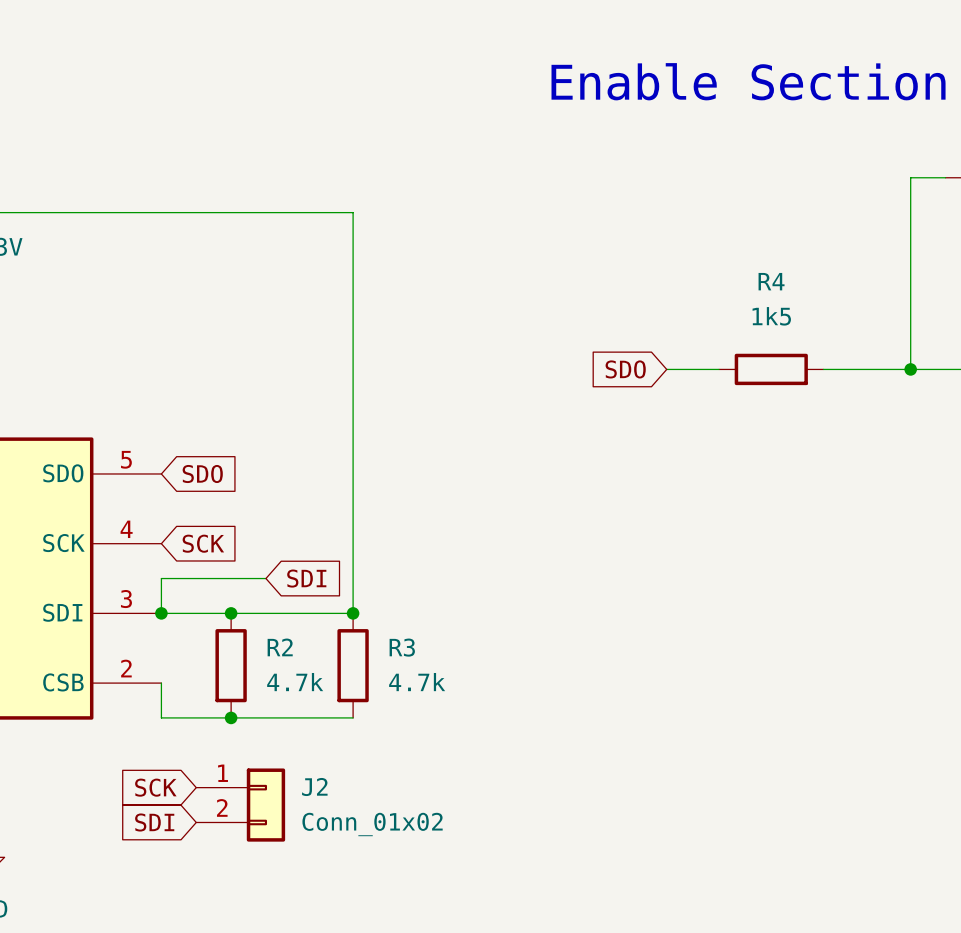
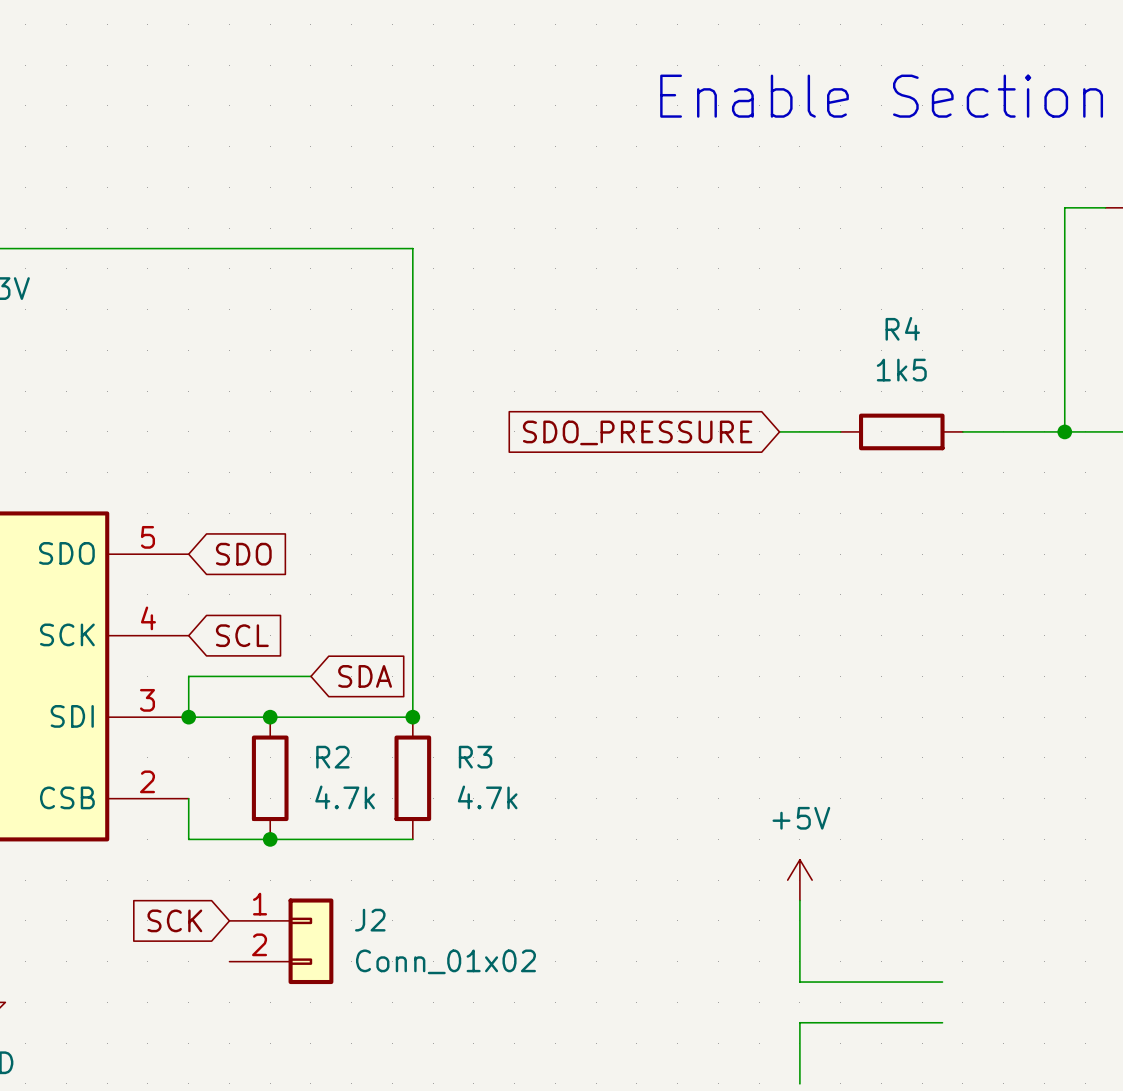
global label: SDO (625, 369) -> SDO_PRESSURE (637, 432)
global label: SCK (203, 543) -> SCL (242, 635)
global label: SDI (306, 578) -> SDA (365, 676)
power symbol: none -> +5V (799, 880)
wire: none -> (799, 900) (799, 982) (942, 982)
global label: SDI (154, 822) -> none
wire: none -> (942, 1022) (799, 1022) (799, 1083)

